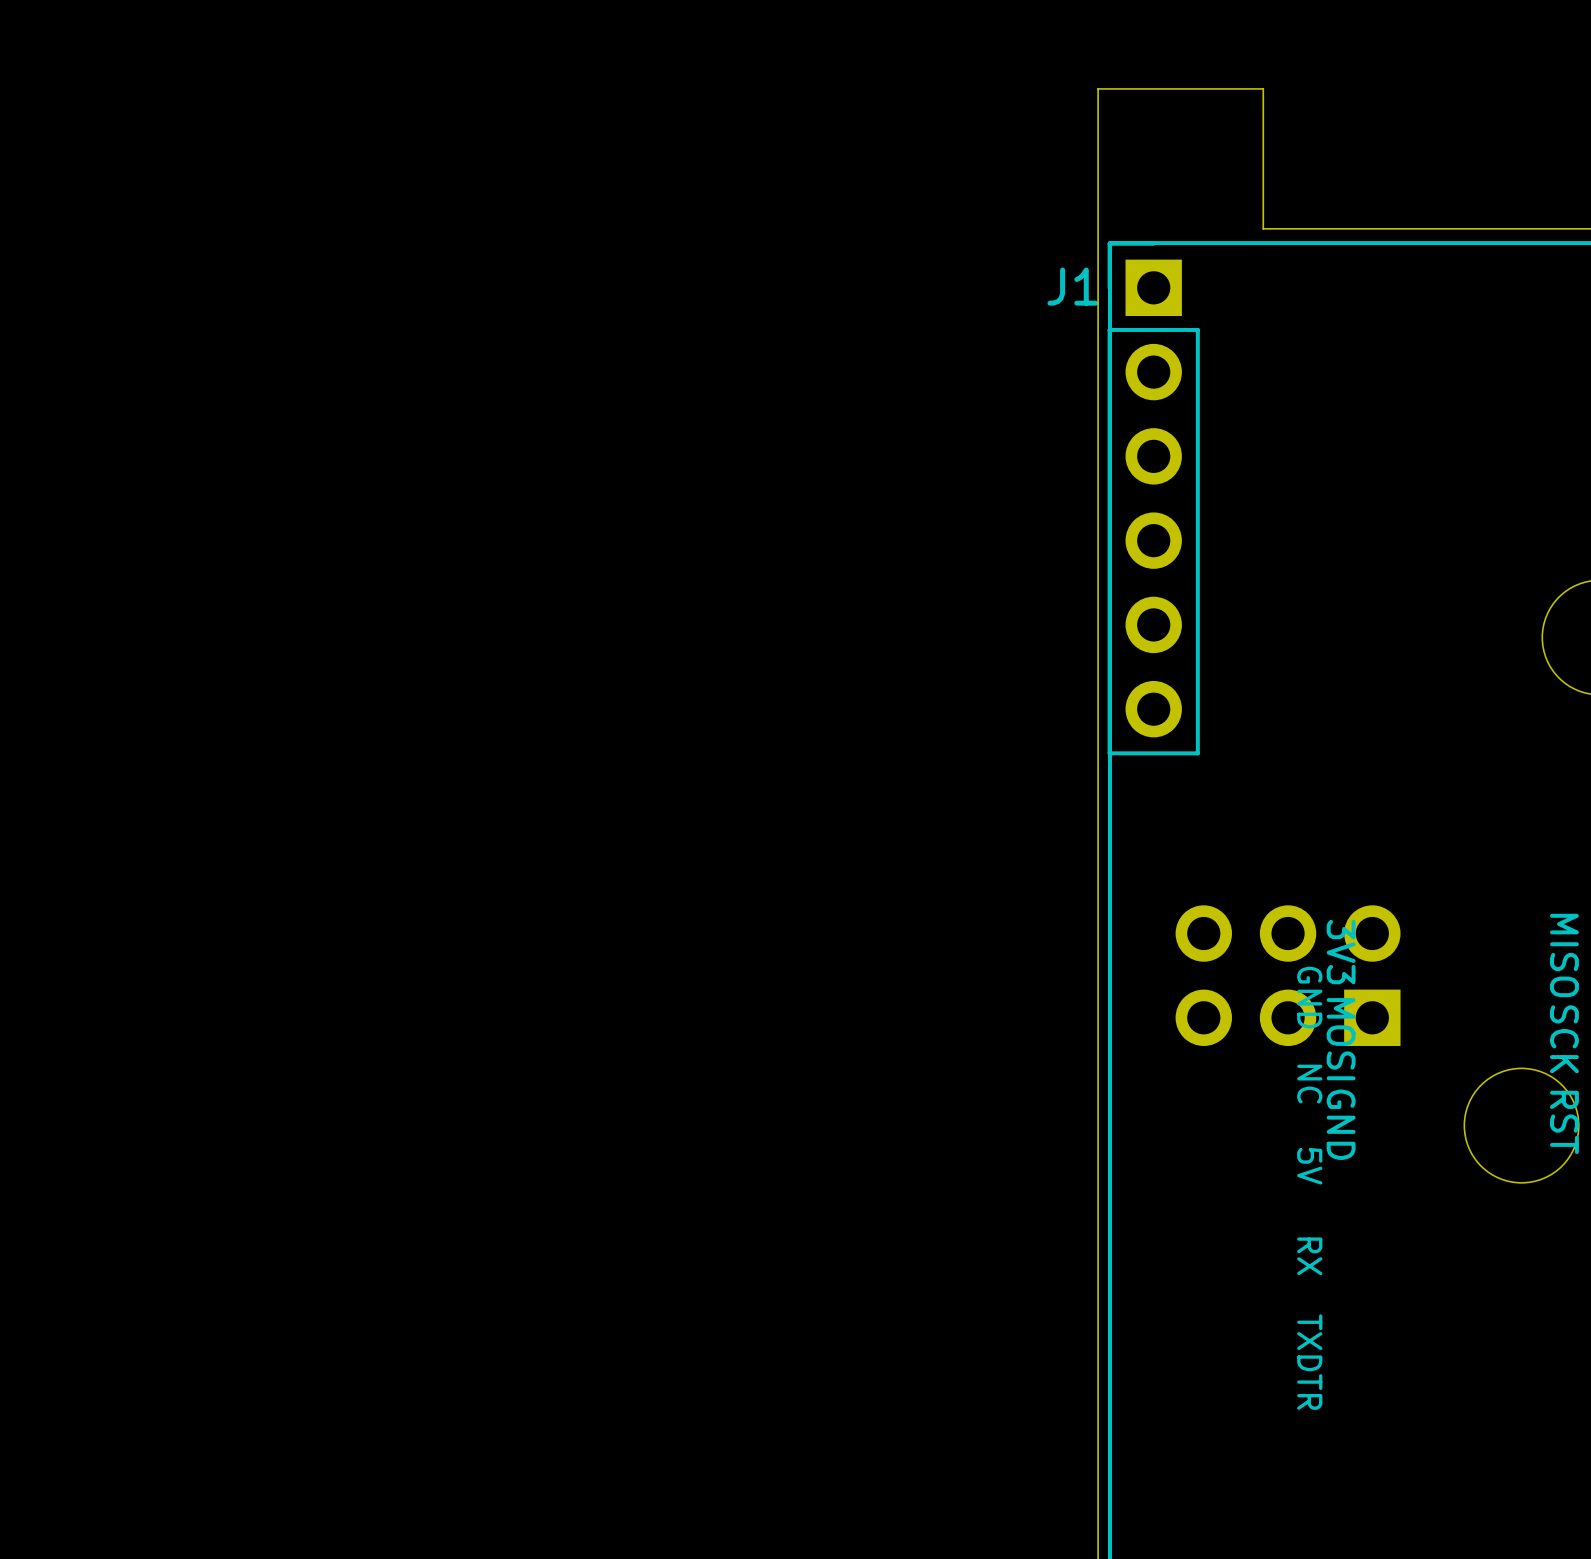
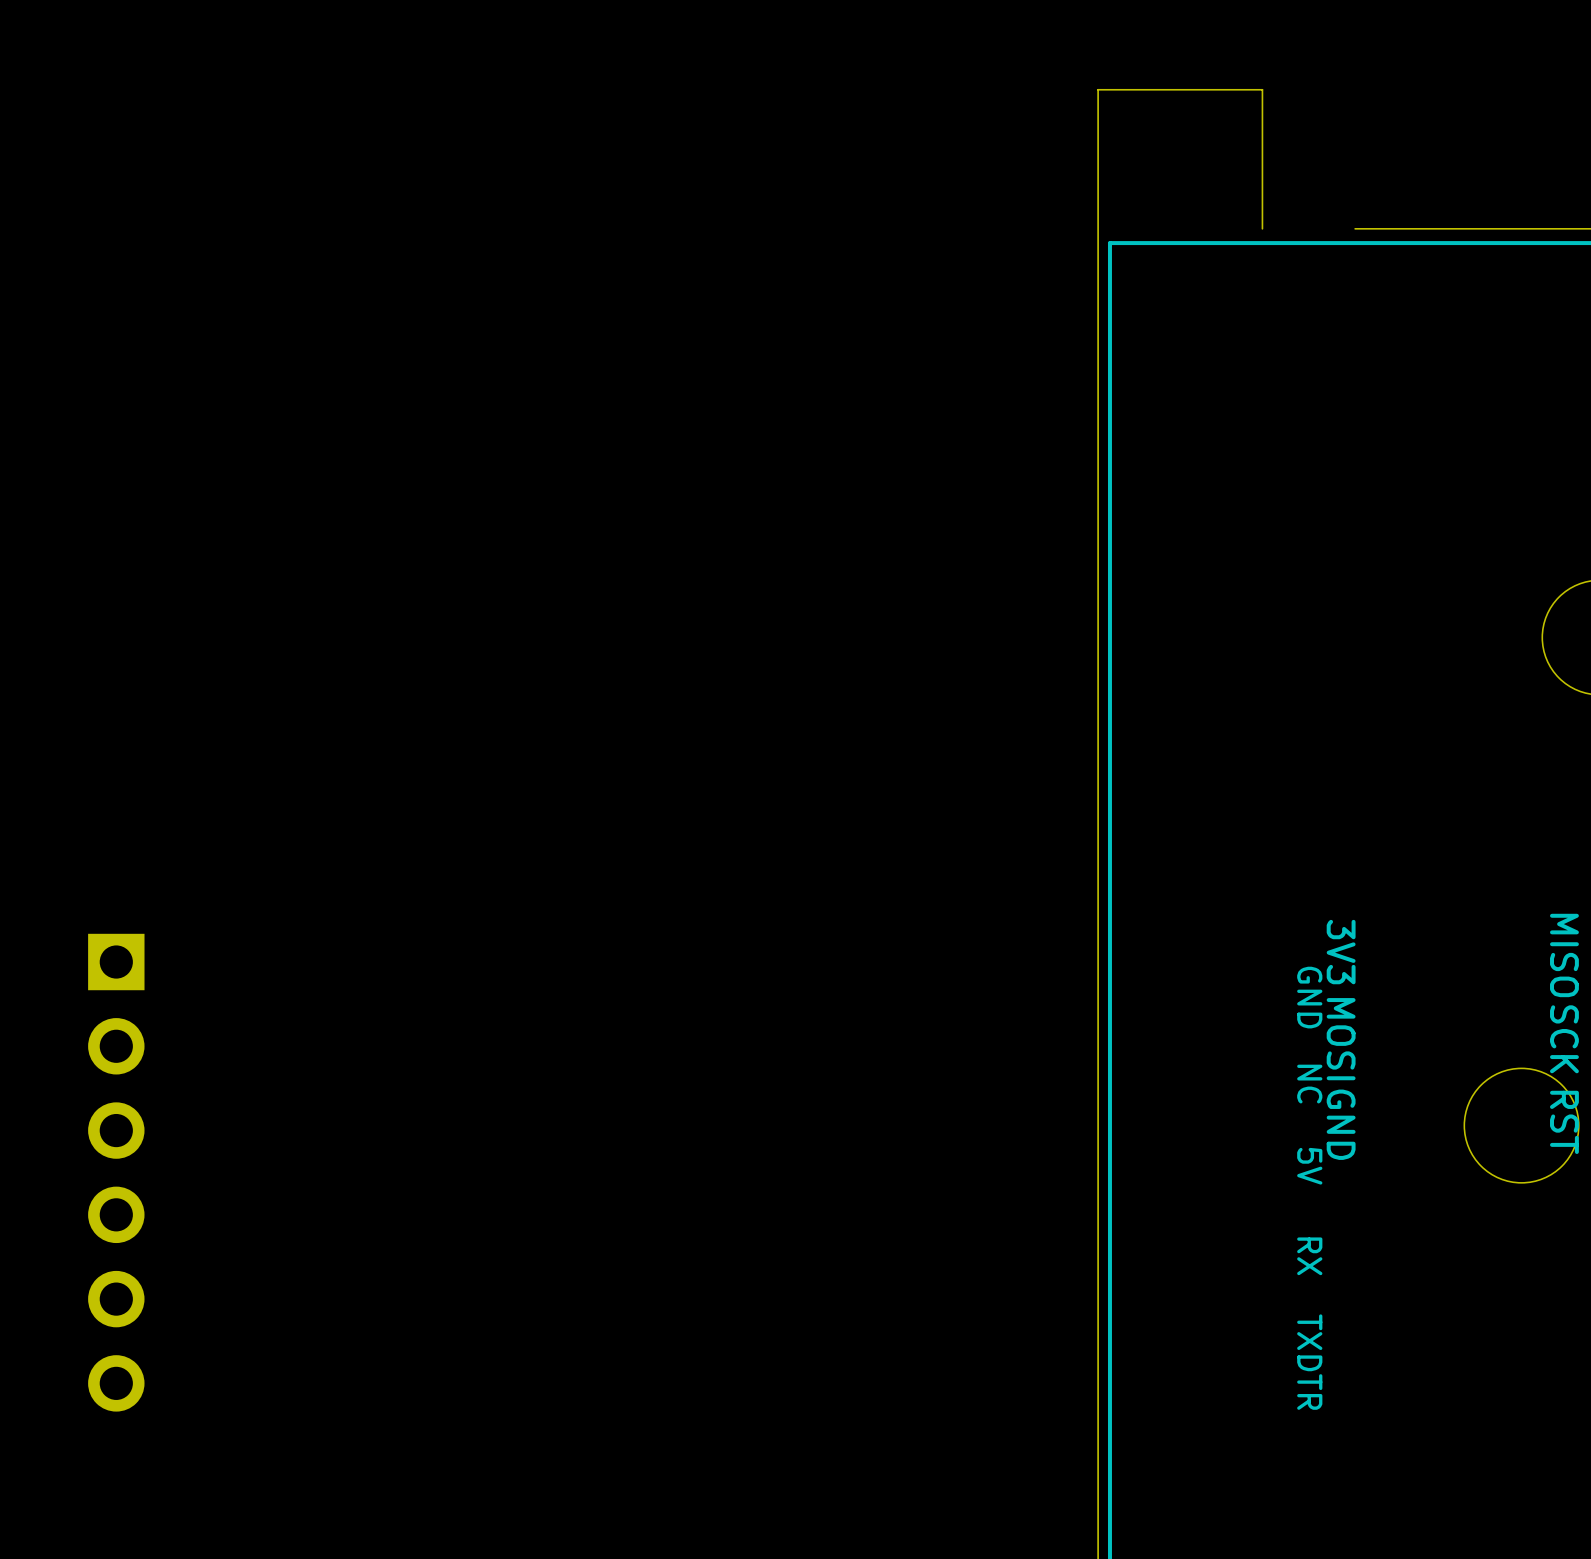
board edge: (1098, 89) (1263, 88) (1263, 228) (1355, 228) -> (1098, 89) (1262, 89) (1262, 228)
J1: (1153, 498) -> none
part: (1288, 975) -> none
part: none -> (116, 1172)

